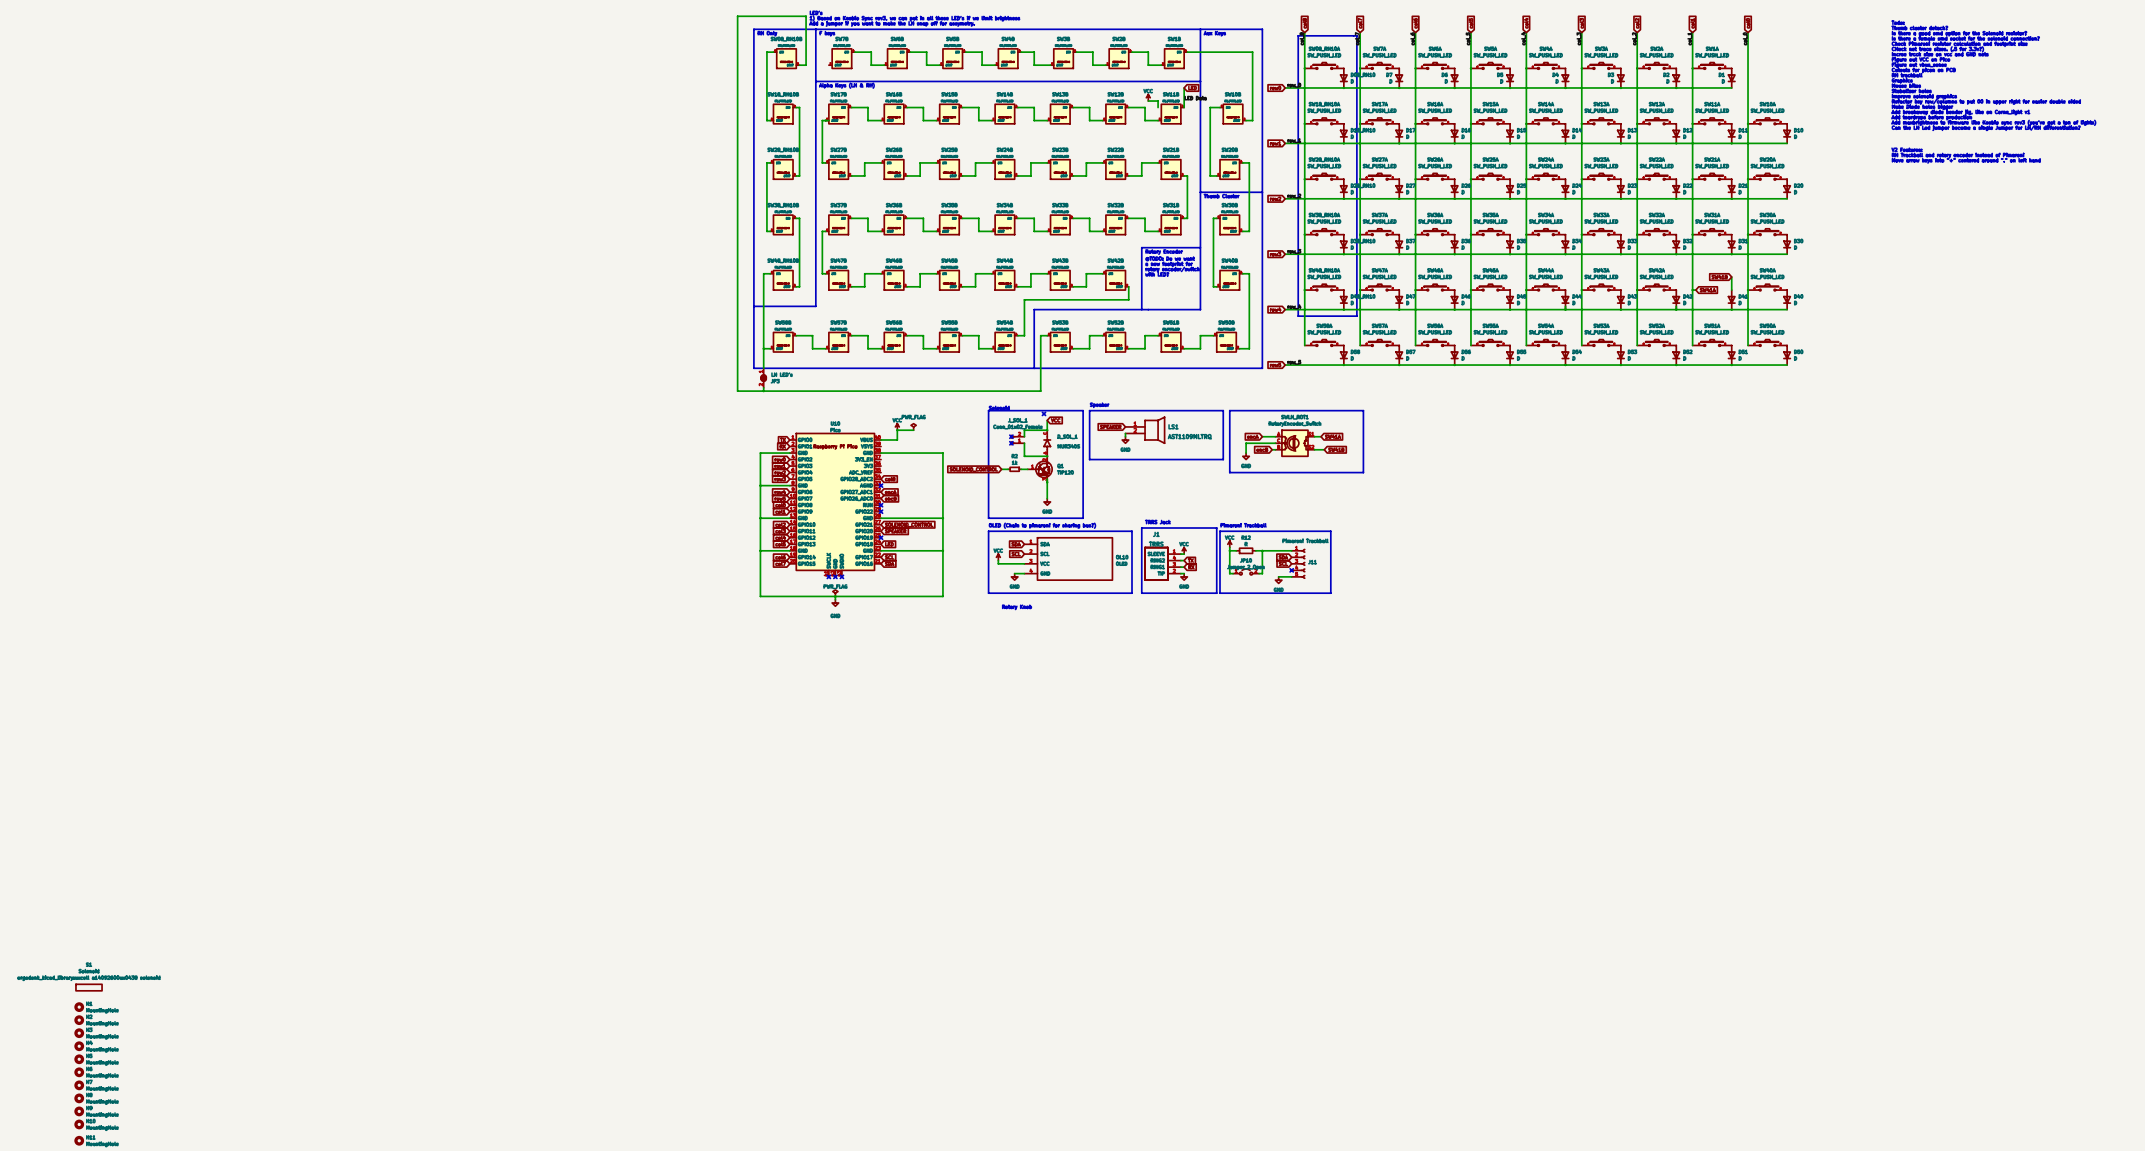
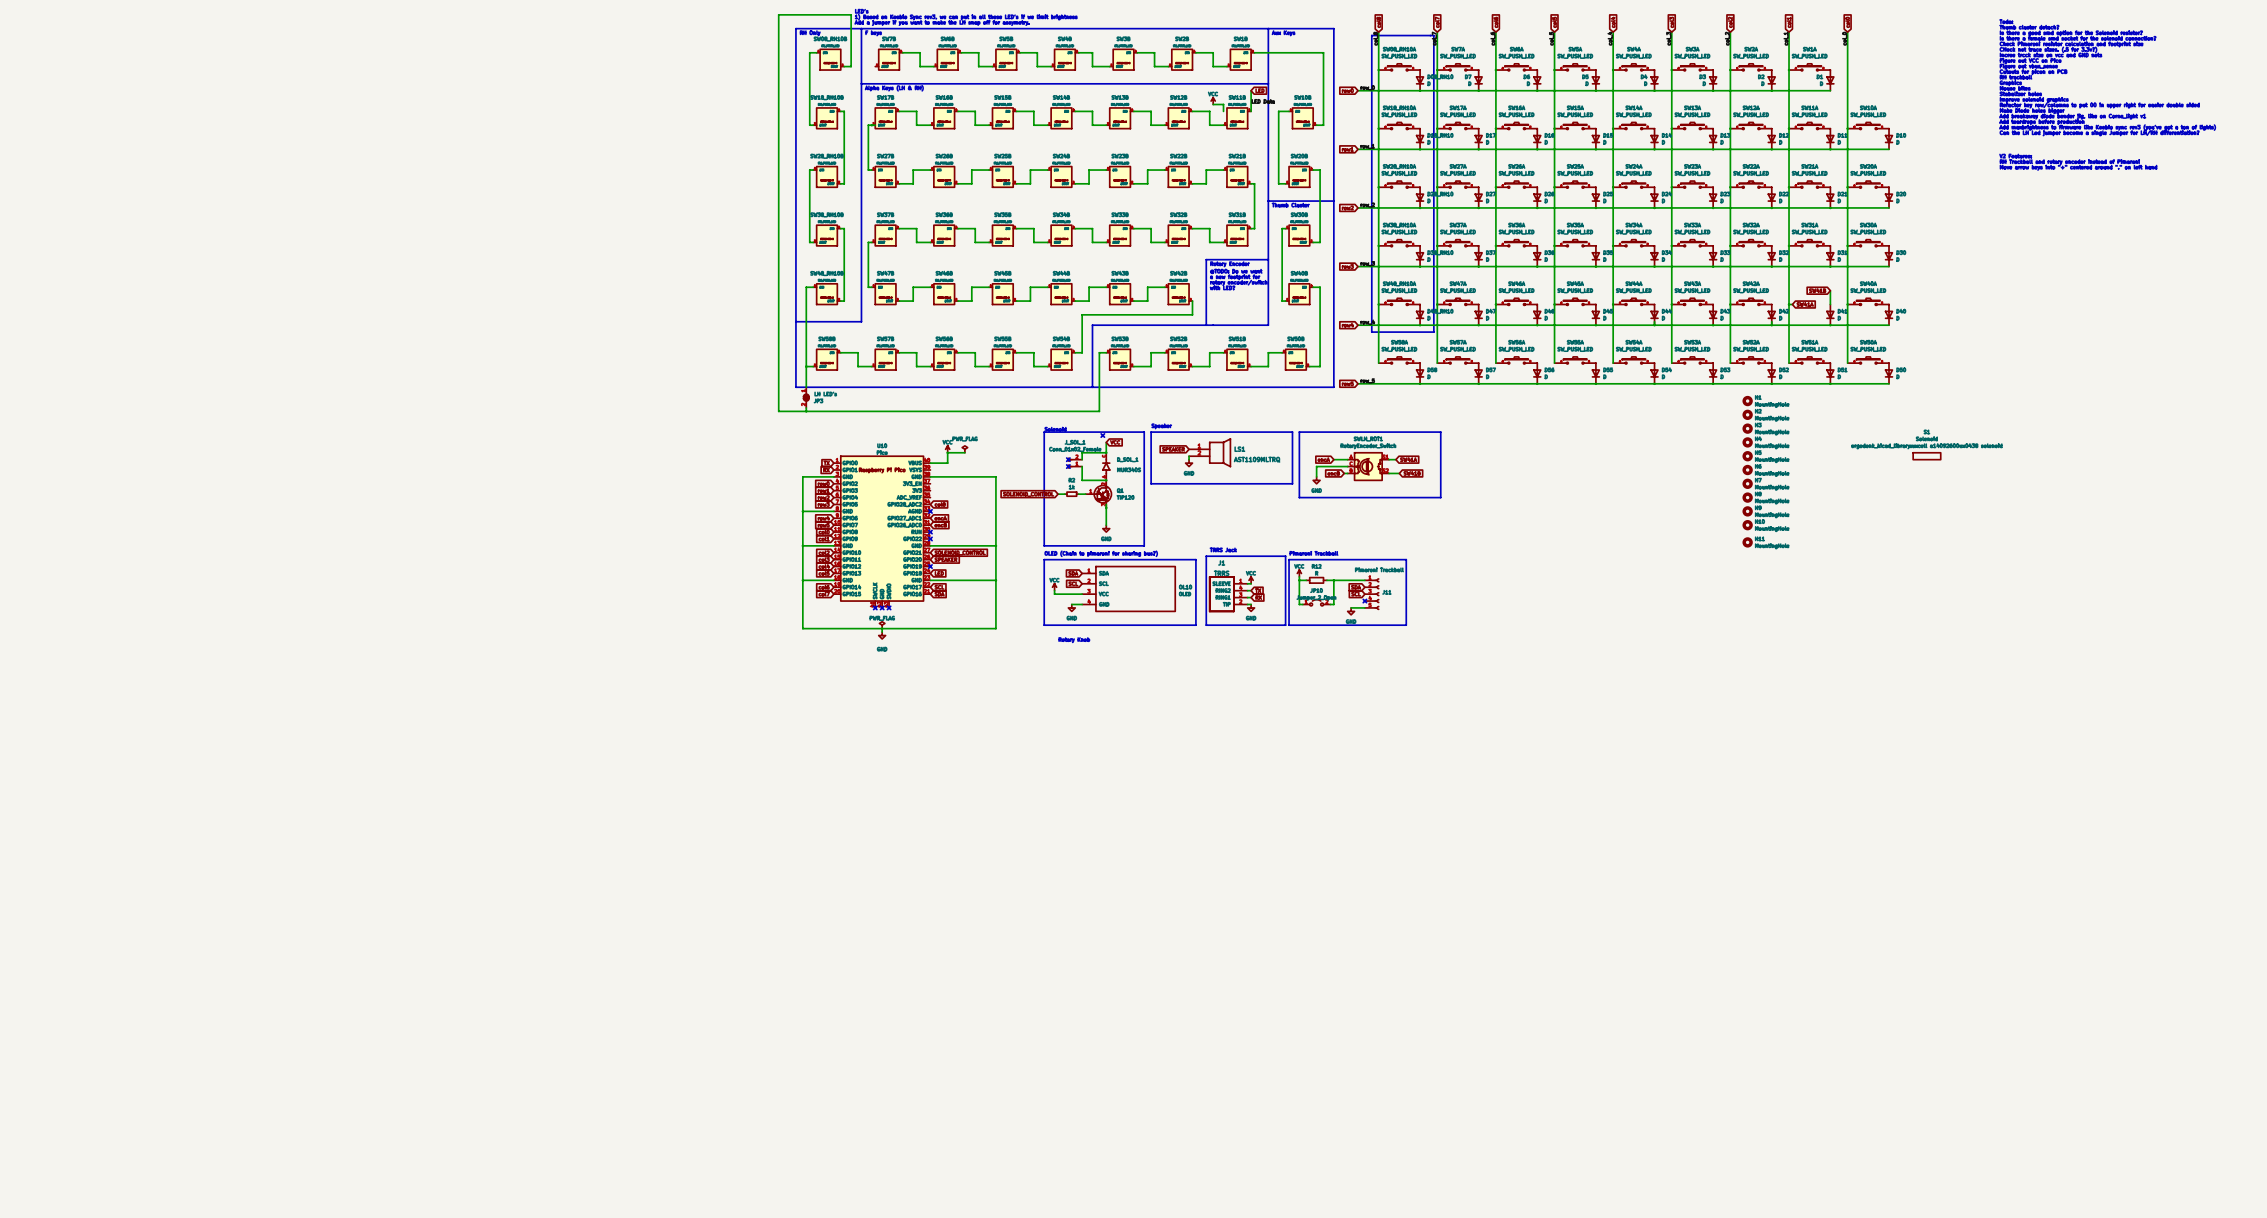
part position: (89, 987) -> (1926, 456)
part position: (79, 1007) -> (1747, 401)
part position: (79, 1020) -> (1747, 414)
part position: (79, 1033) -> (1747, 428)
part position: (79, 1046) -> (1747, 442)
part position: (79, 1059) -> (1747, 456)
part position: (79, 1072) -> (1747, 470)
part position: (79, 1085) -> (1747, 483)
part position: (79, 1098) -> (1747, 497)
part position: (79, 1111) -> (1747, 511)
part position: (79, 1124) -> (1747, 525)
part position: (79, 1140) -> (1747, 542)

